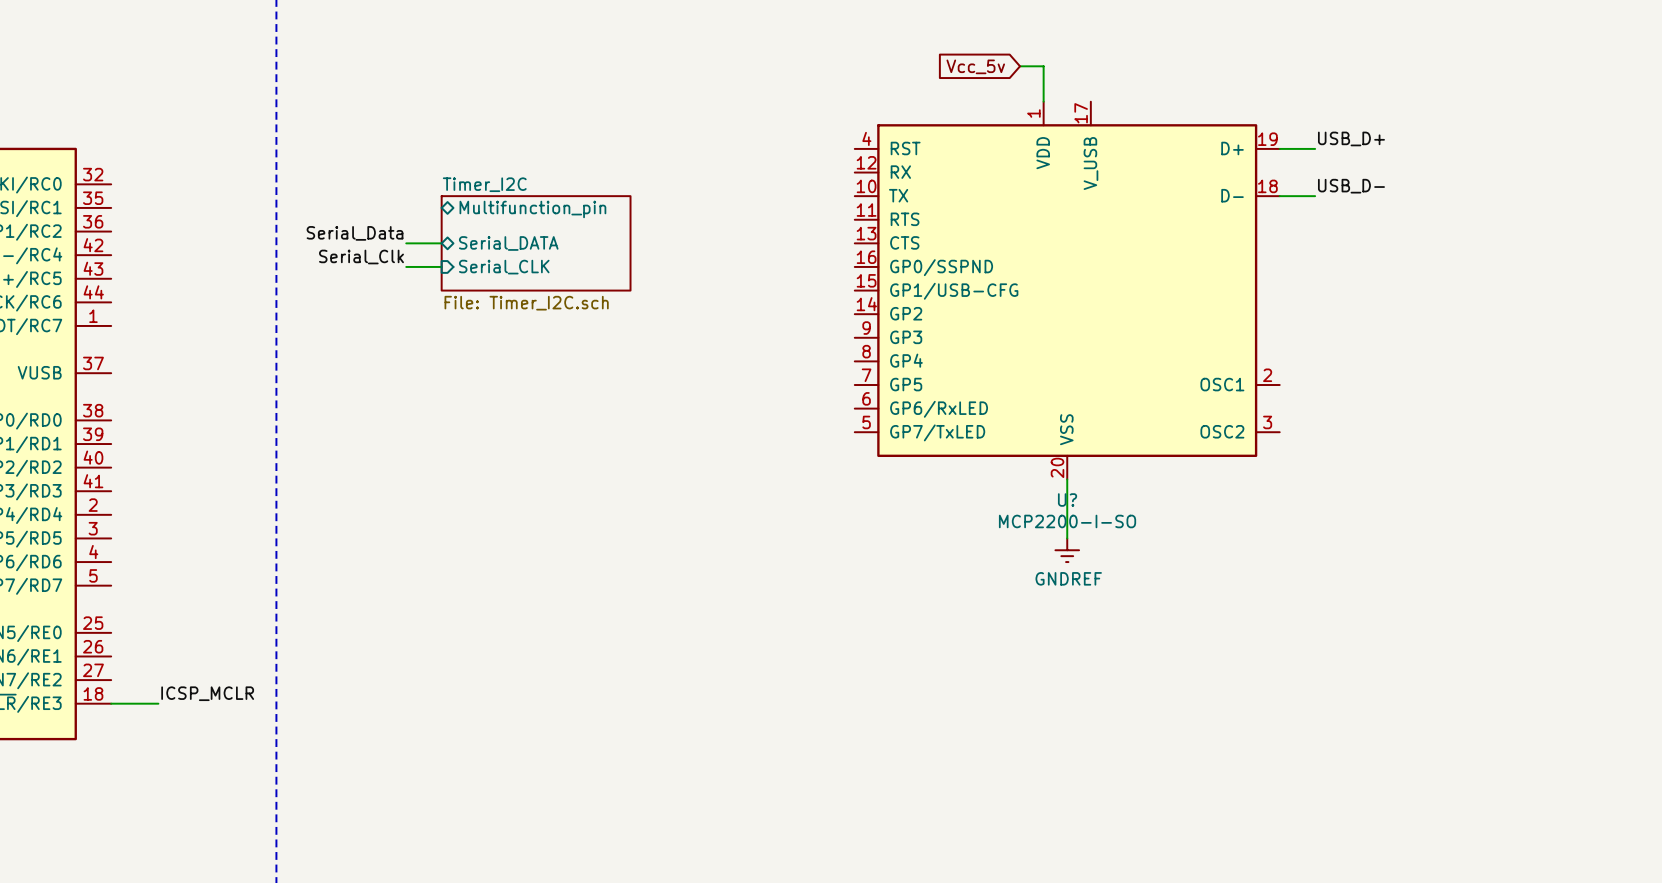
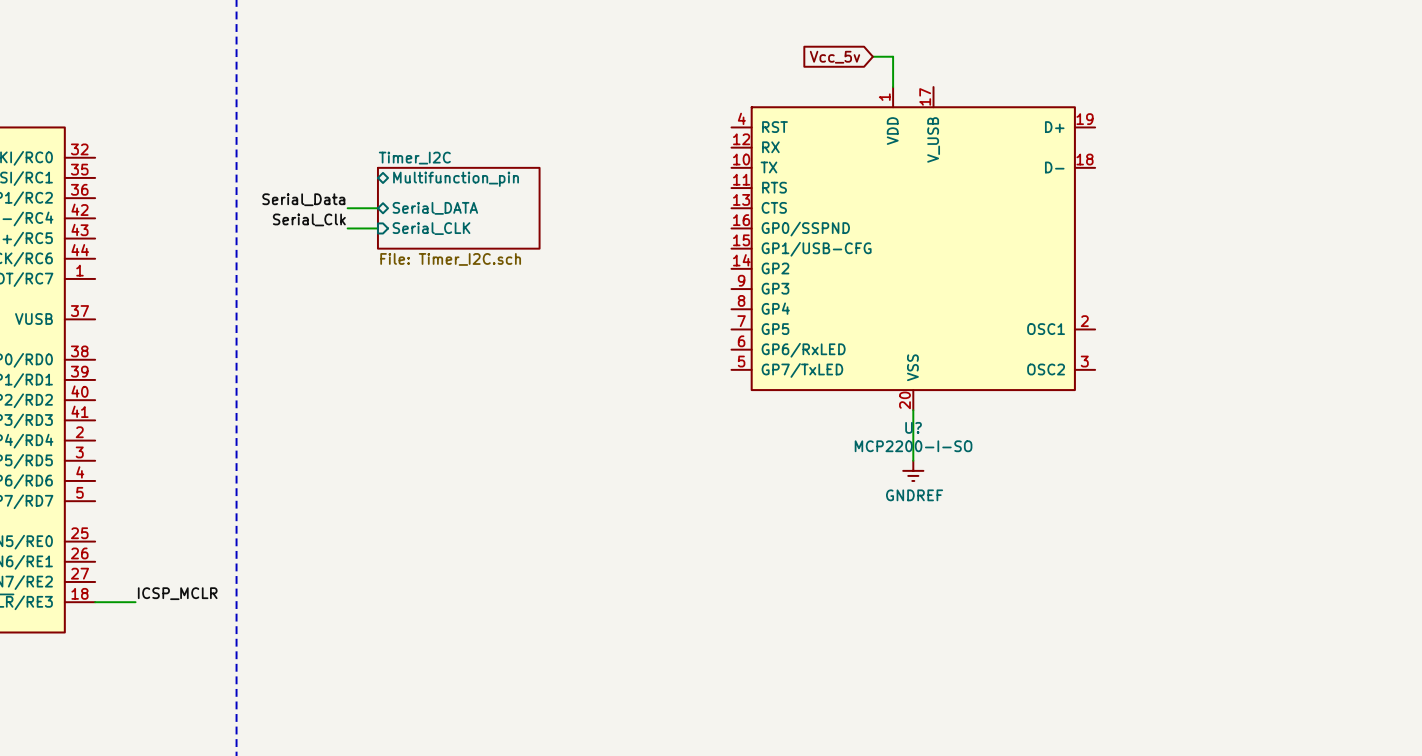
label: USB_D+ (1351, 138) -> none
wire: (1279, 148) (1315, 148) -> none
label: USB_D- (1351, 186) -> none
wire: (1279, 196) (1315, 196) -> none

